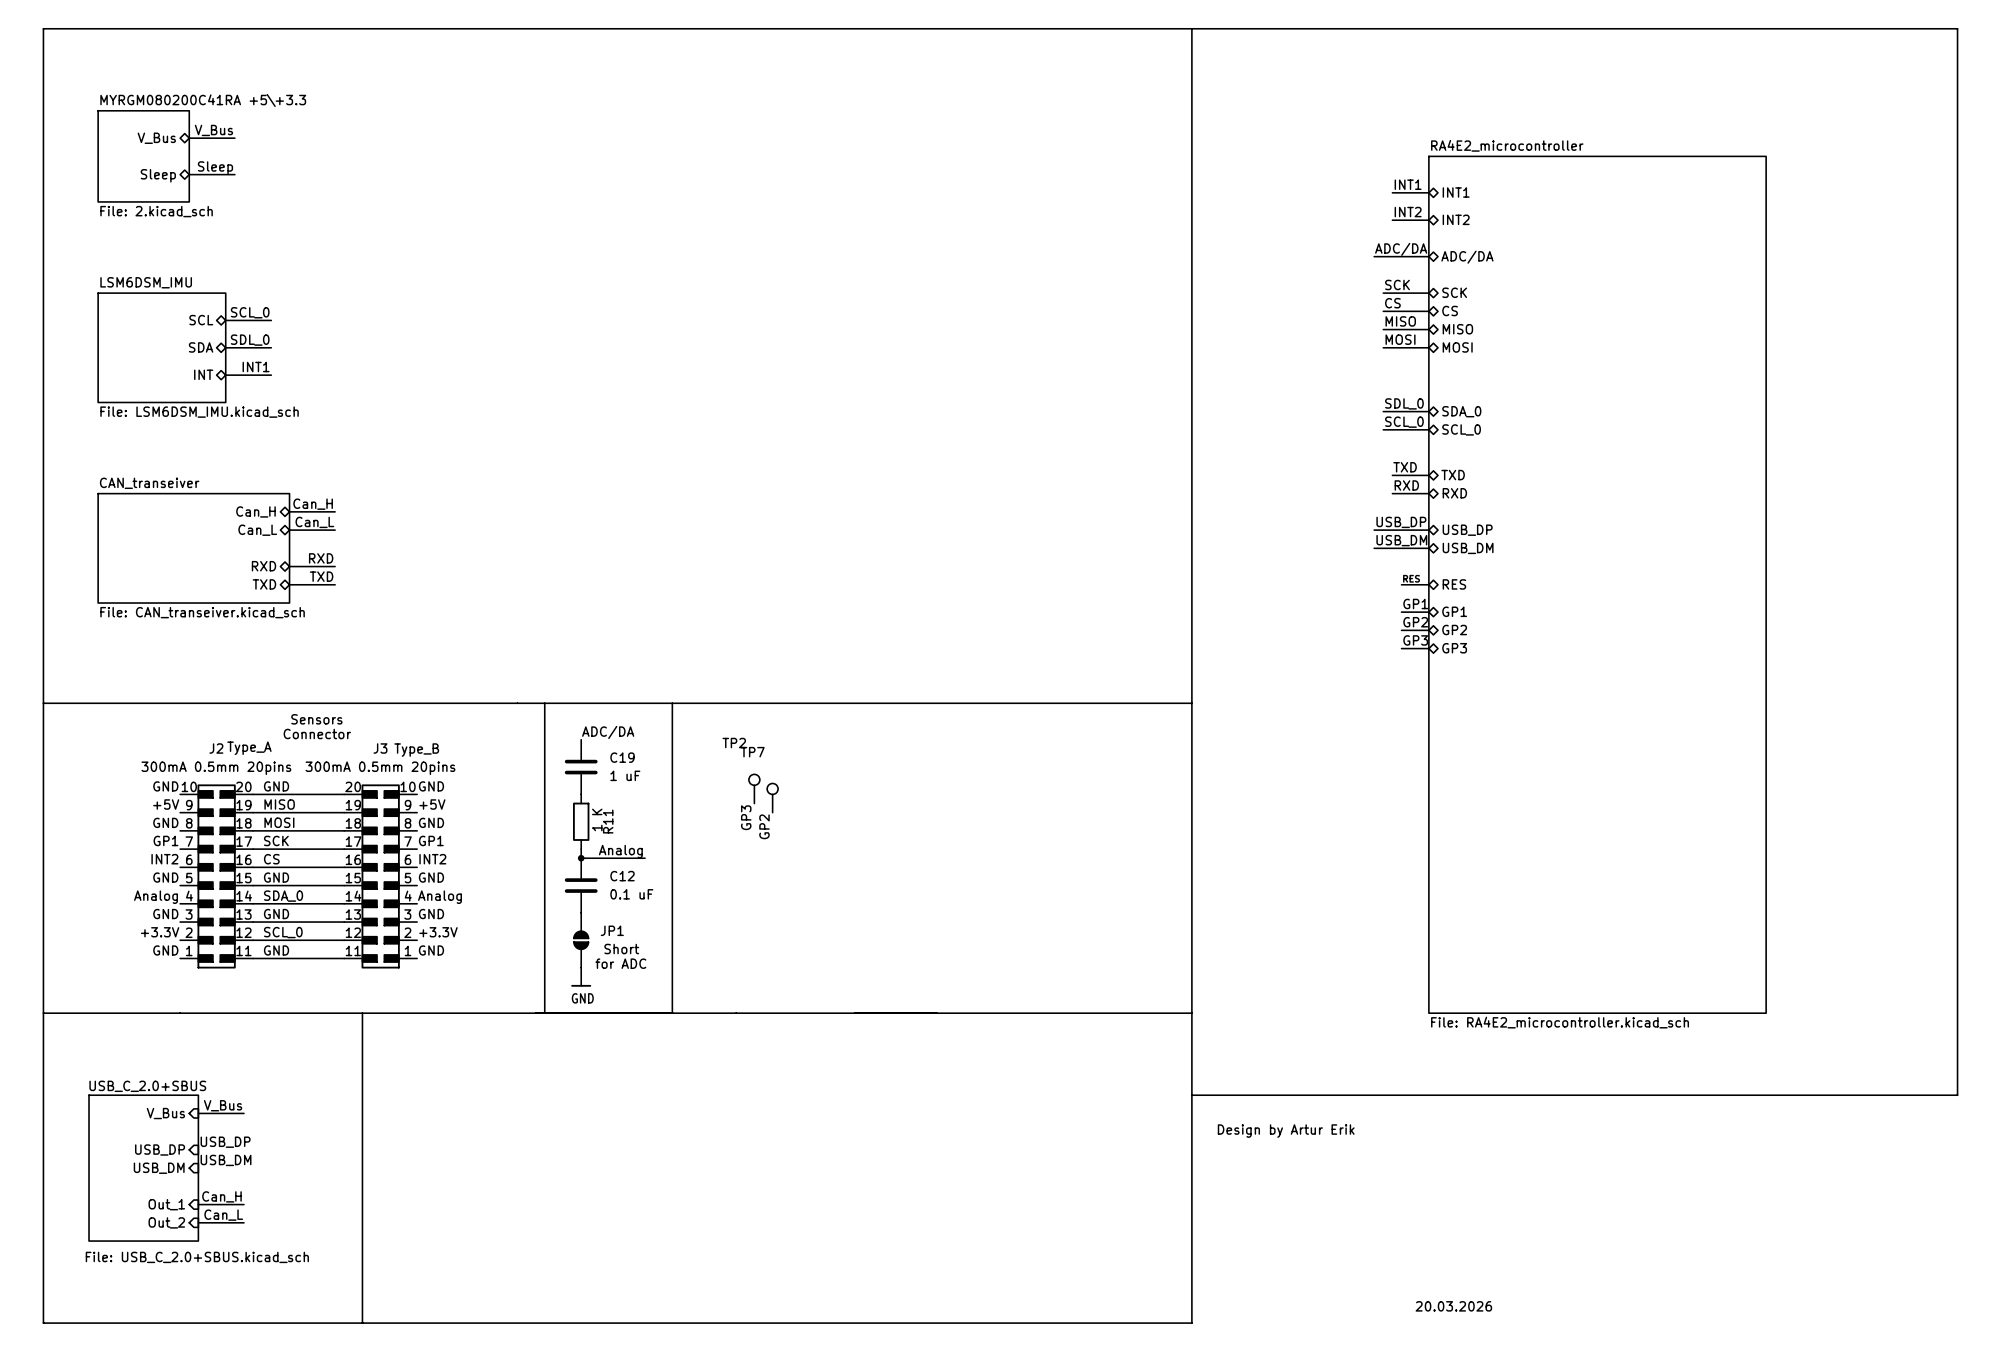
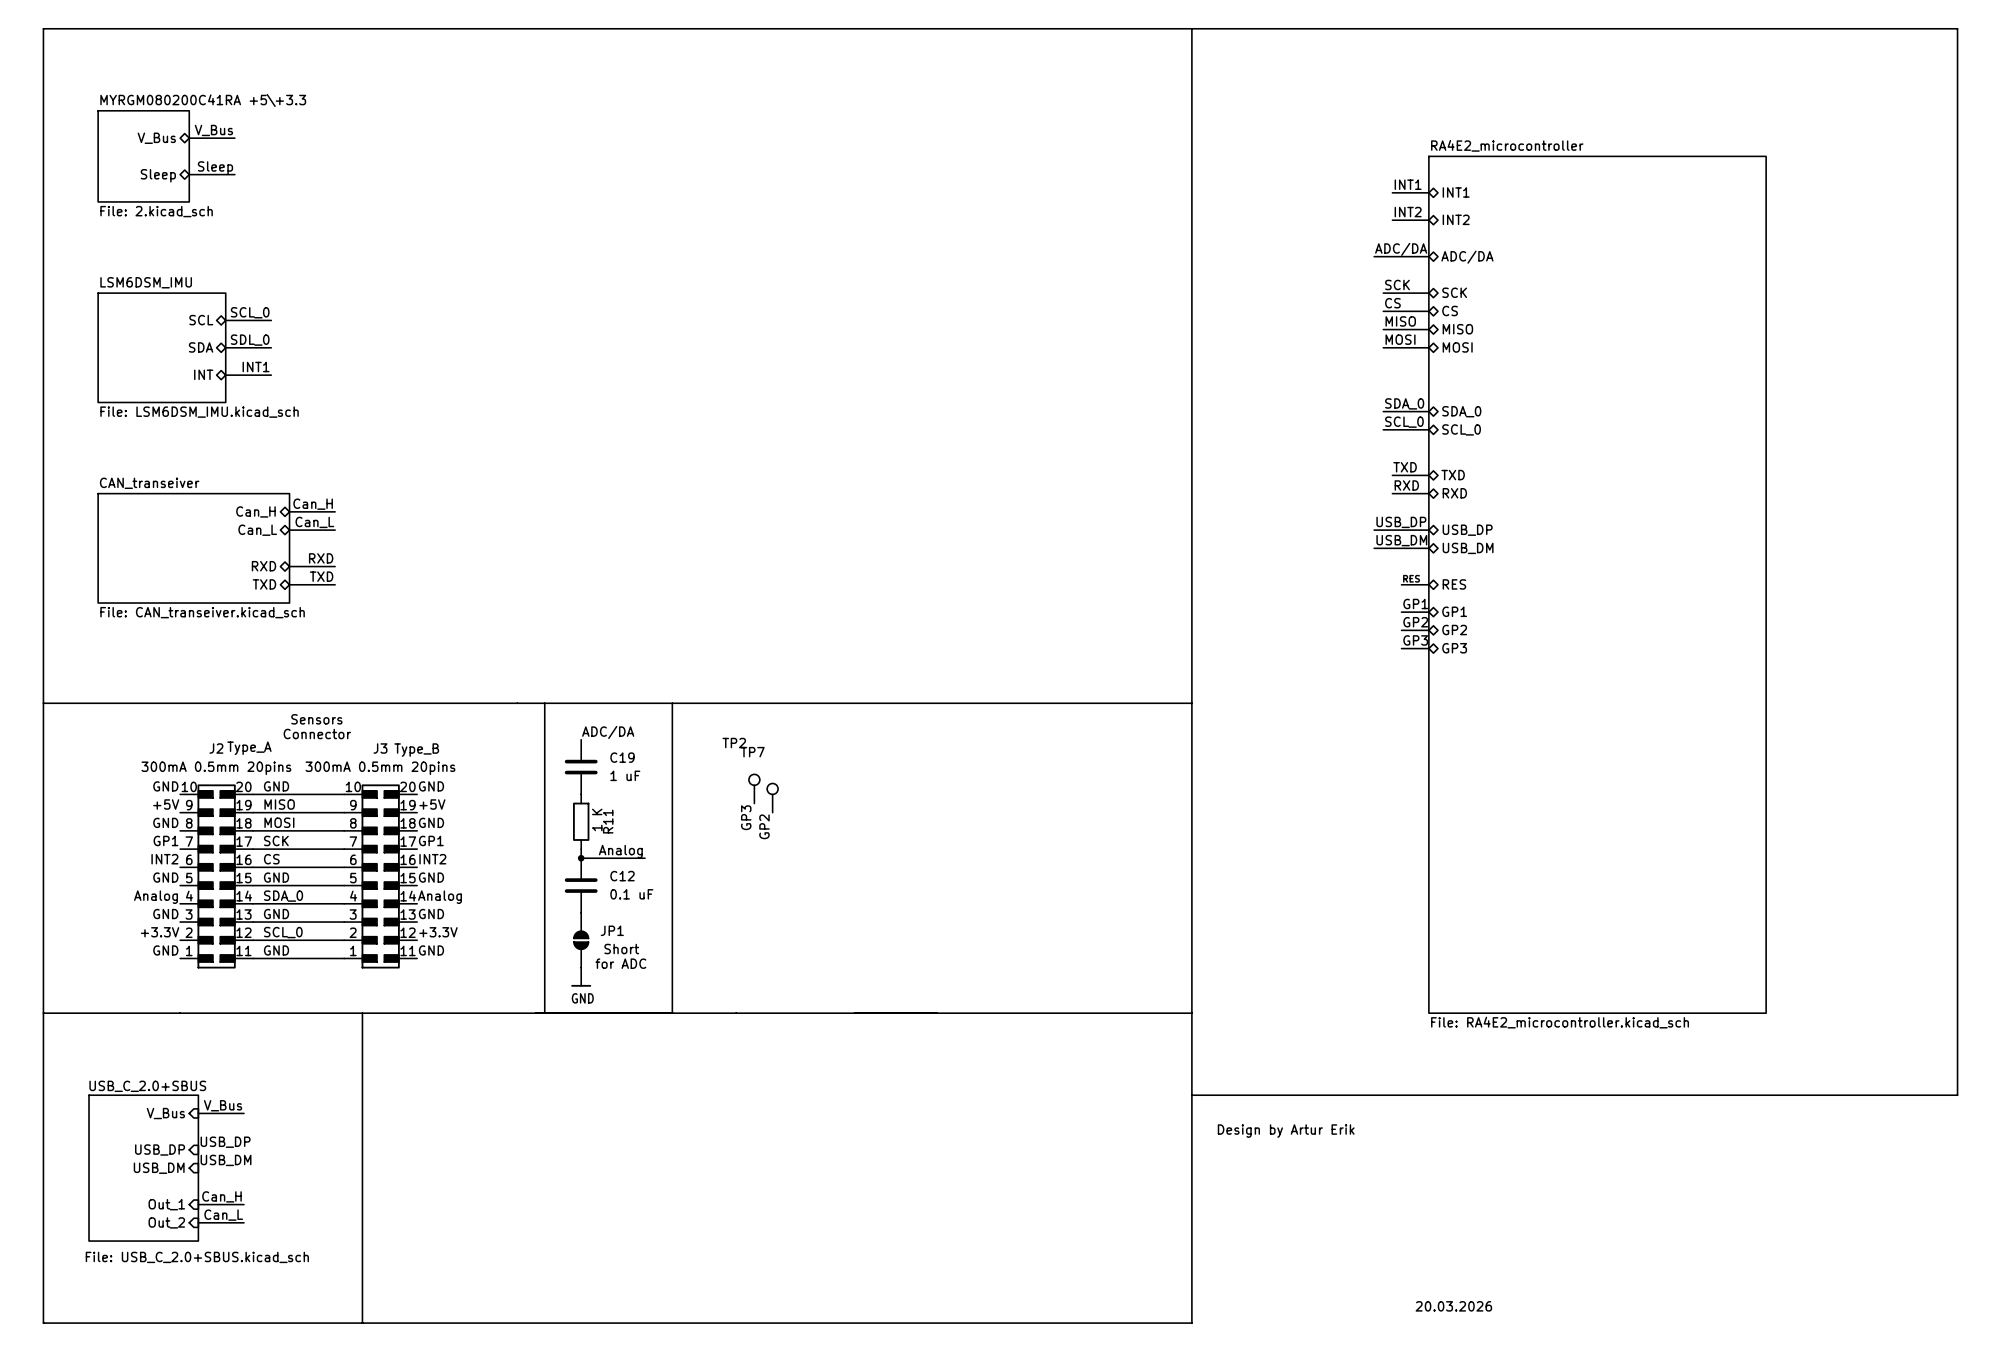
label: SDL_0 (1404, 403) -> SDA_0 (1404, 403)
J3 flip: as is (380, 876) -> left-right (380, 876)

